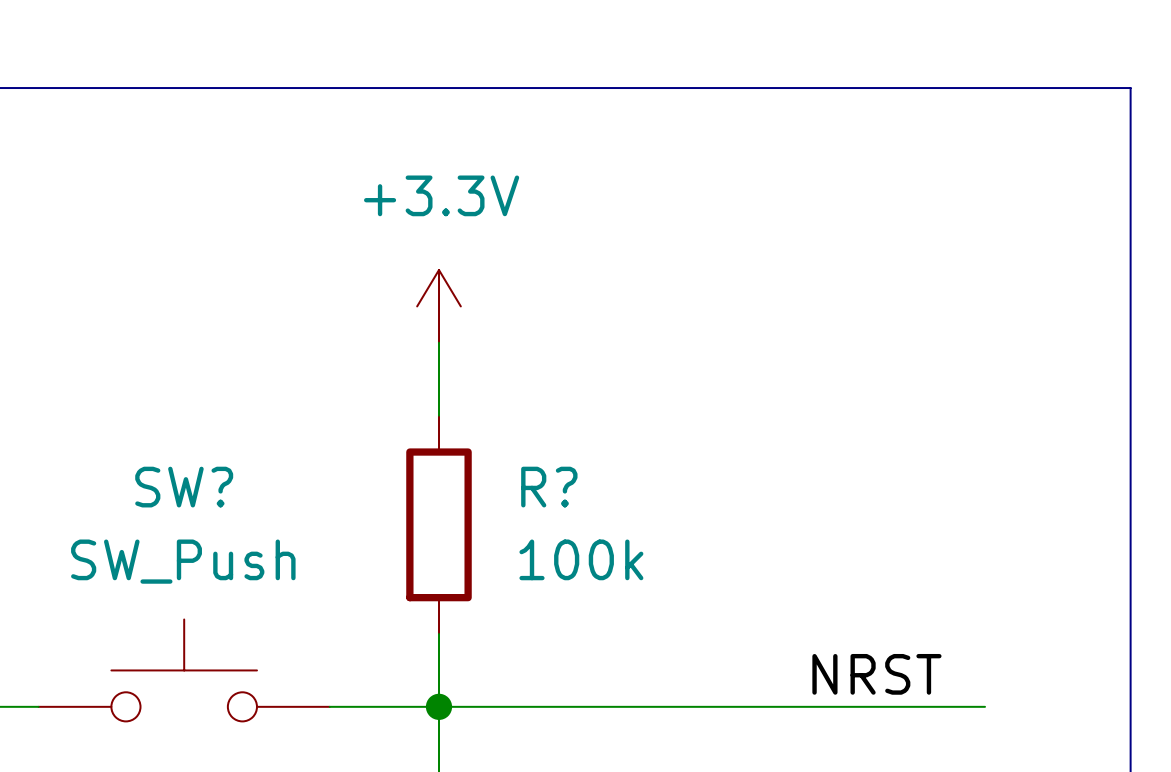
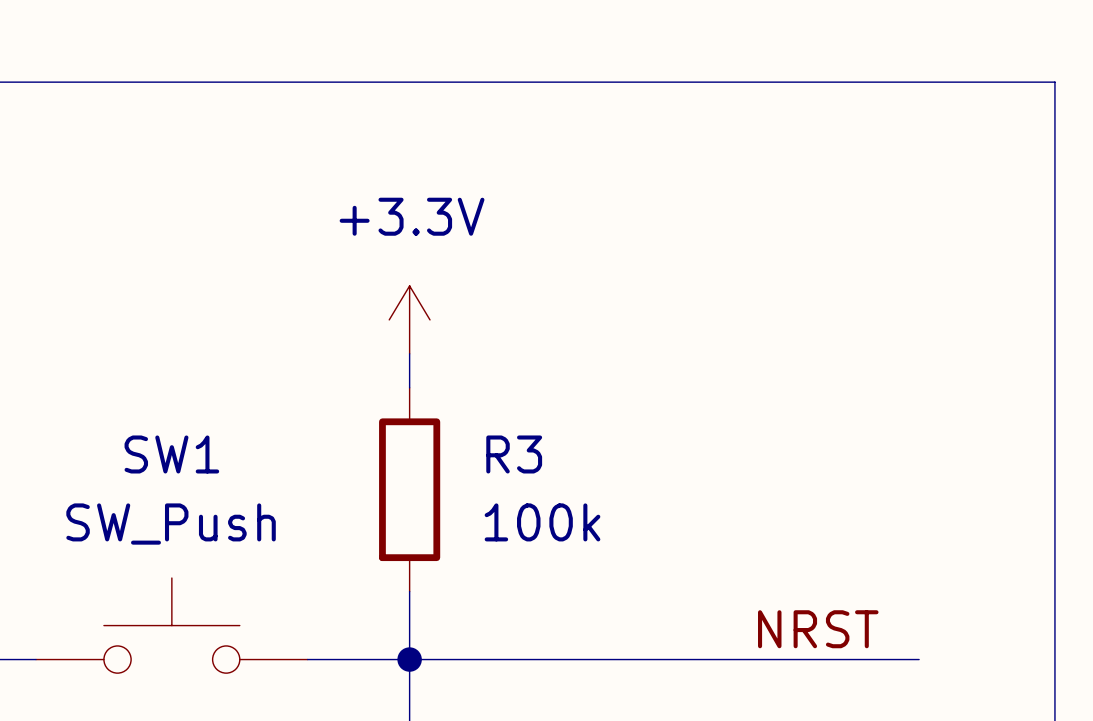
power symbol position: +3.3V (439, 306) -> +3.3V (409, 319)
SW? name: SW? (184, 487) -> SW1 (171, 454)
R? name: R? (549, 487) -> R3 (514, 454)

